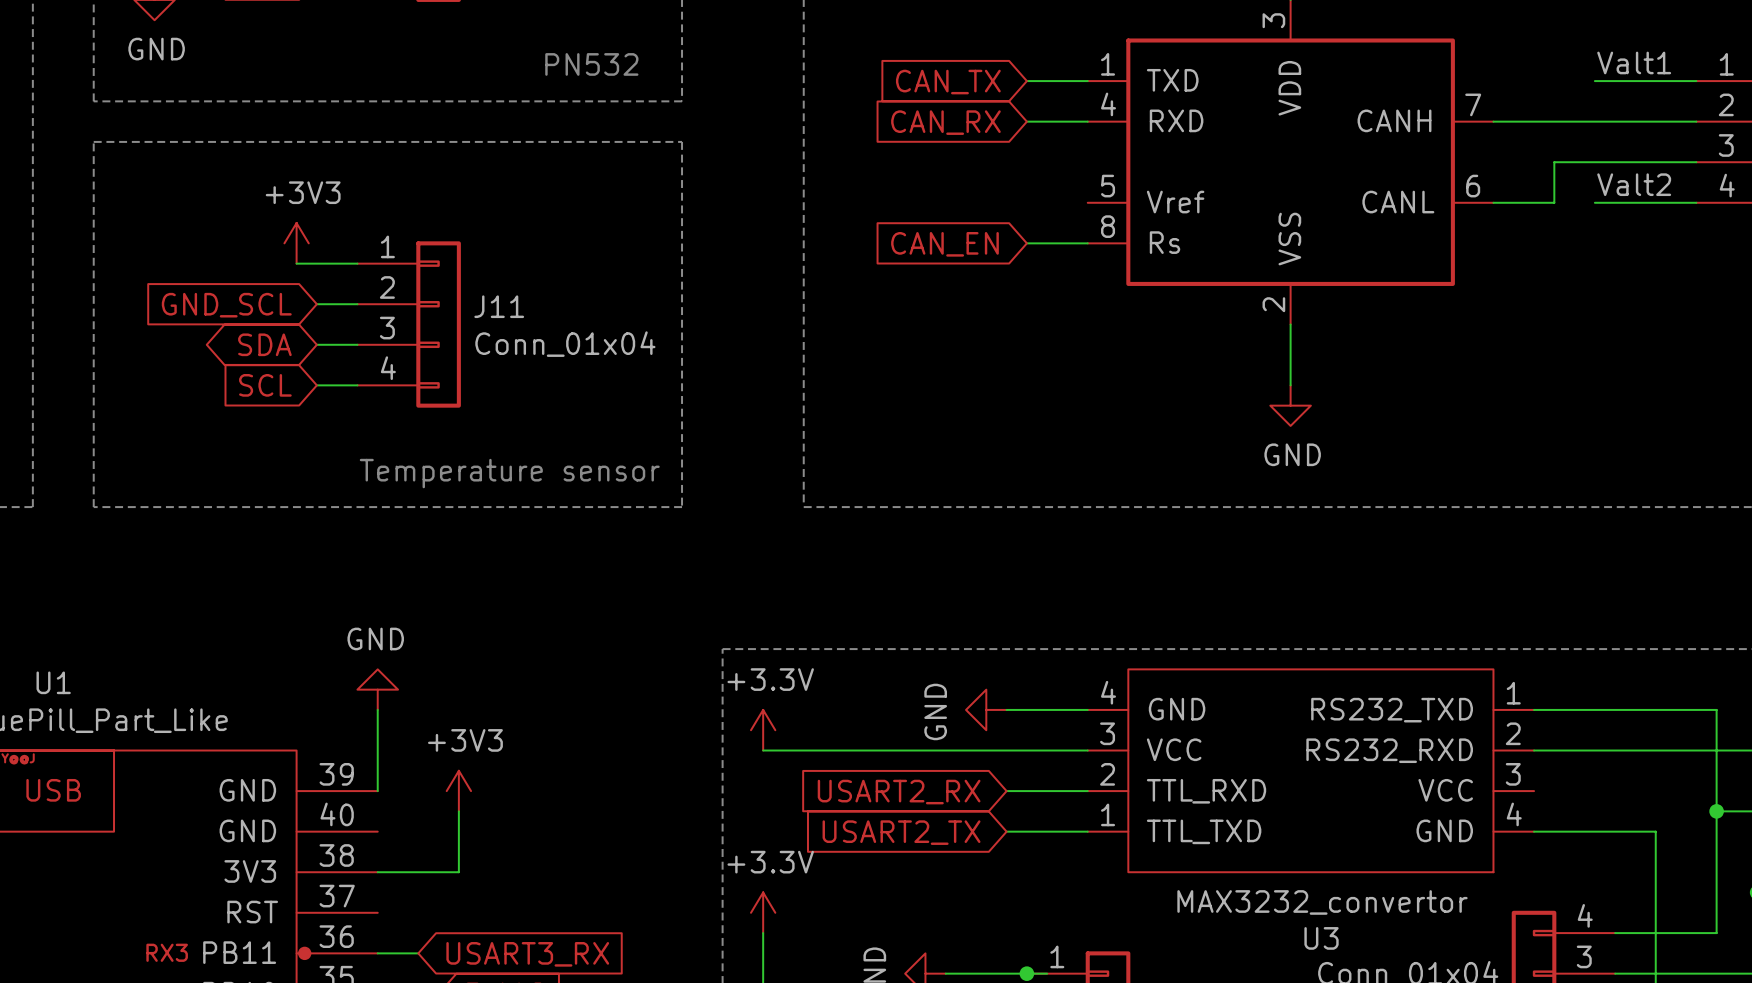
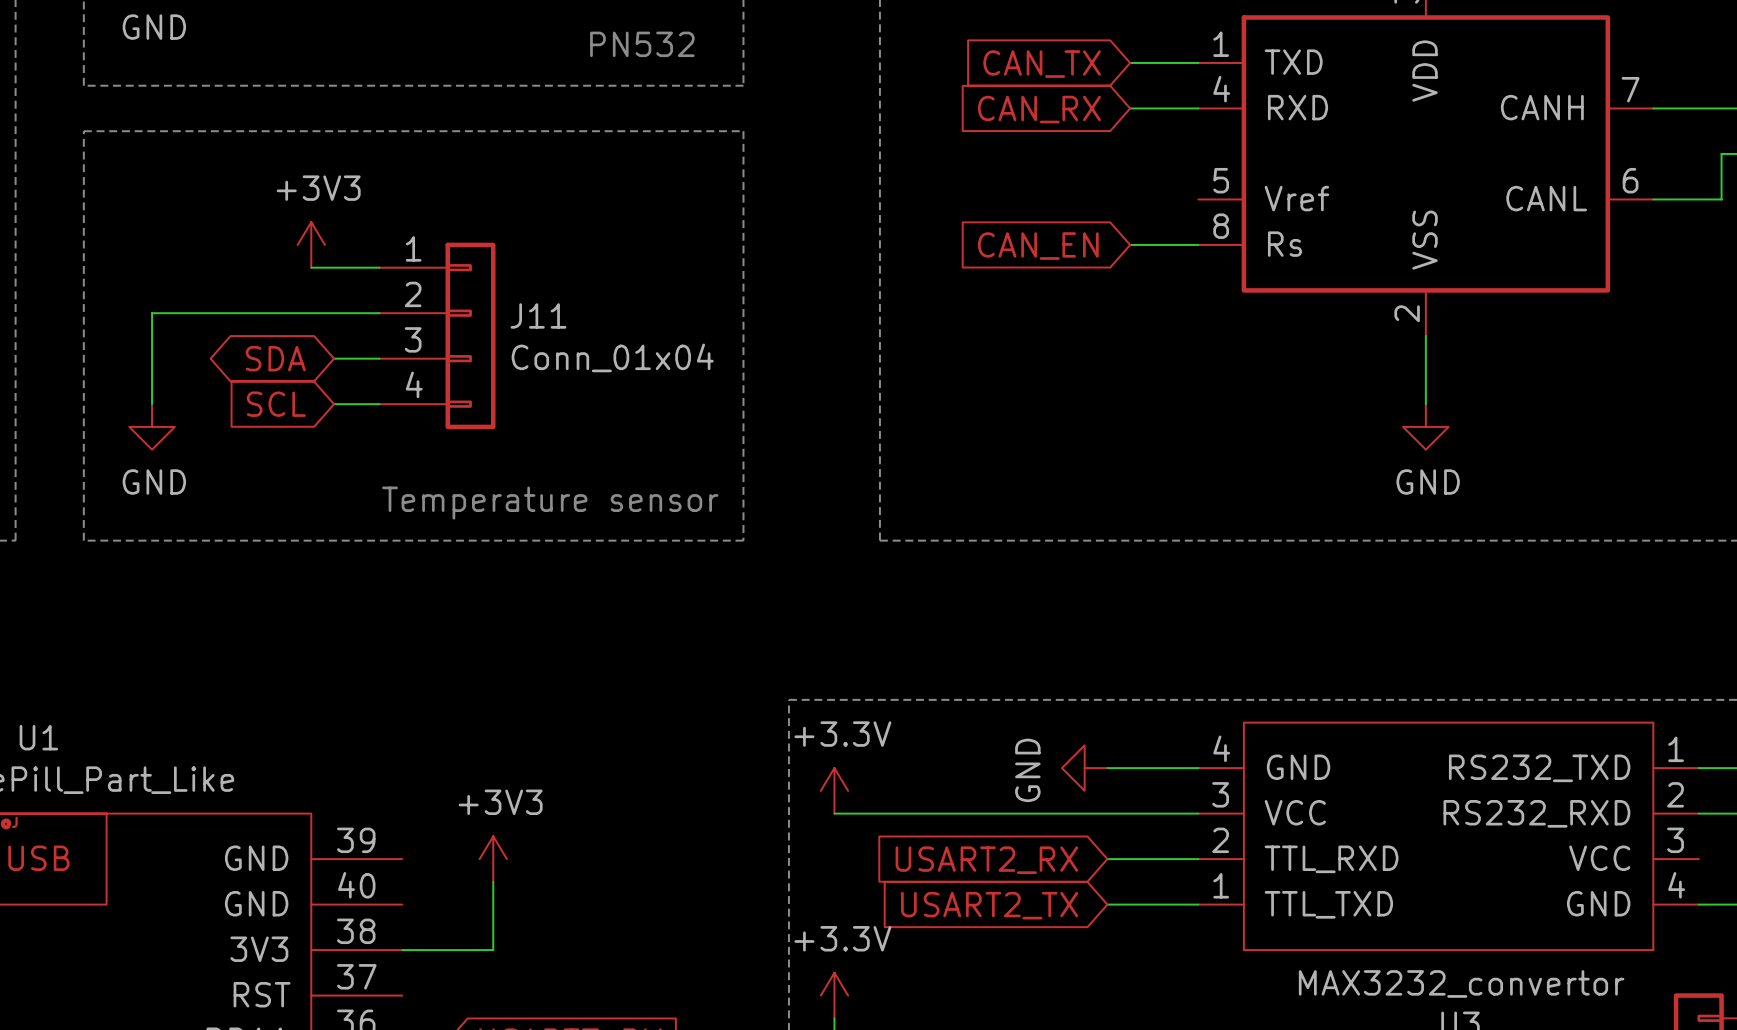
wire: none -> (334, 313) (152, 313) (152, 404)
global label: GND_SCL (226, 305) -> none
power symbol rotation: 0° (377, 689) -> 180° (152, 426)
power symbol position: GND (377, 689) -> GND (152, 426)
wire: (377, 709) (377, 791) -> none

